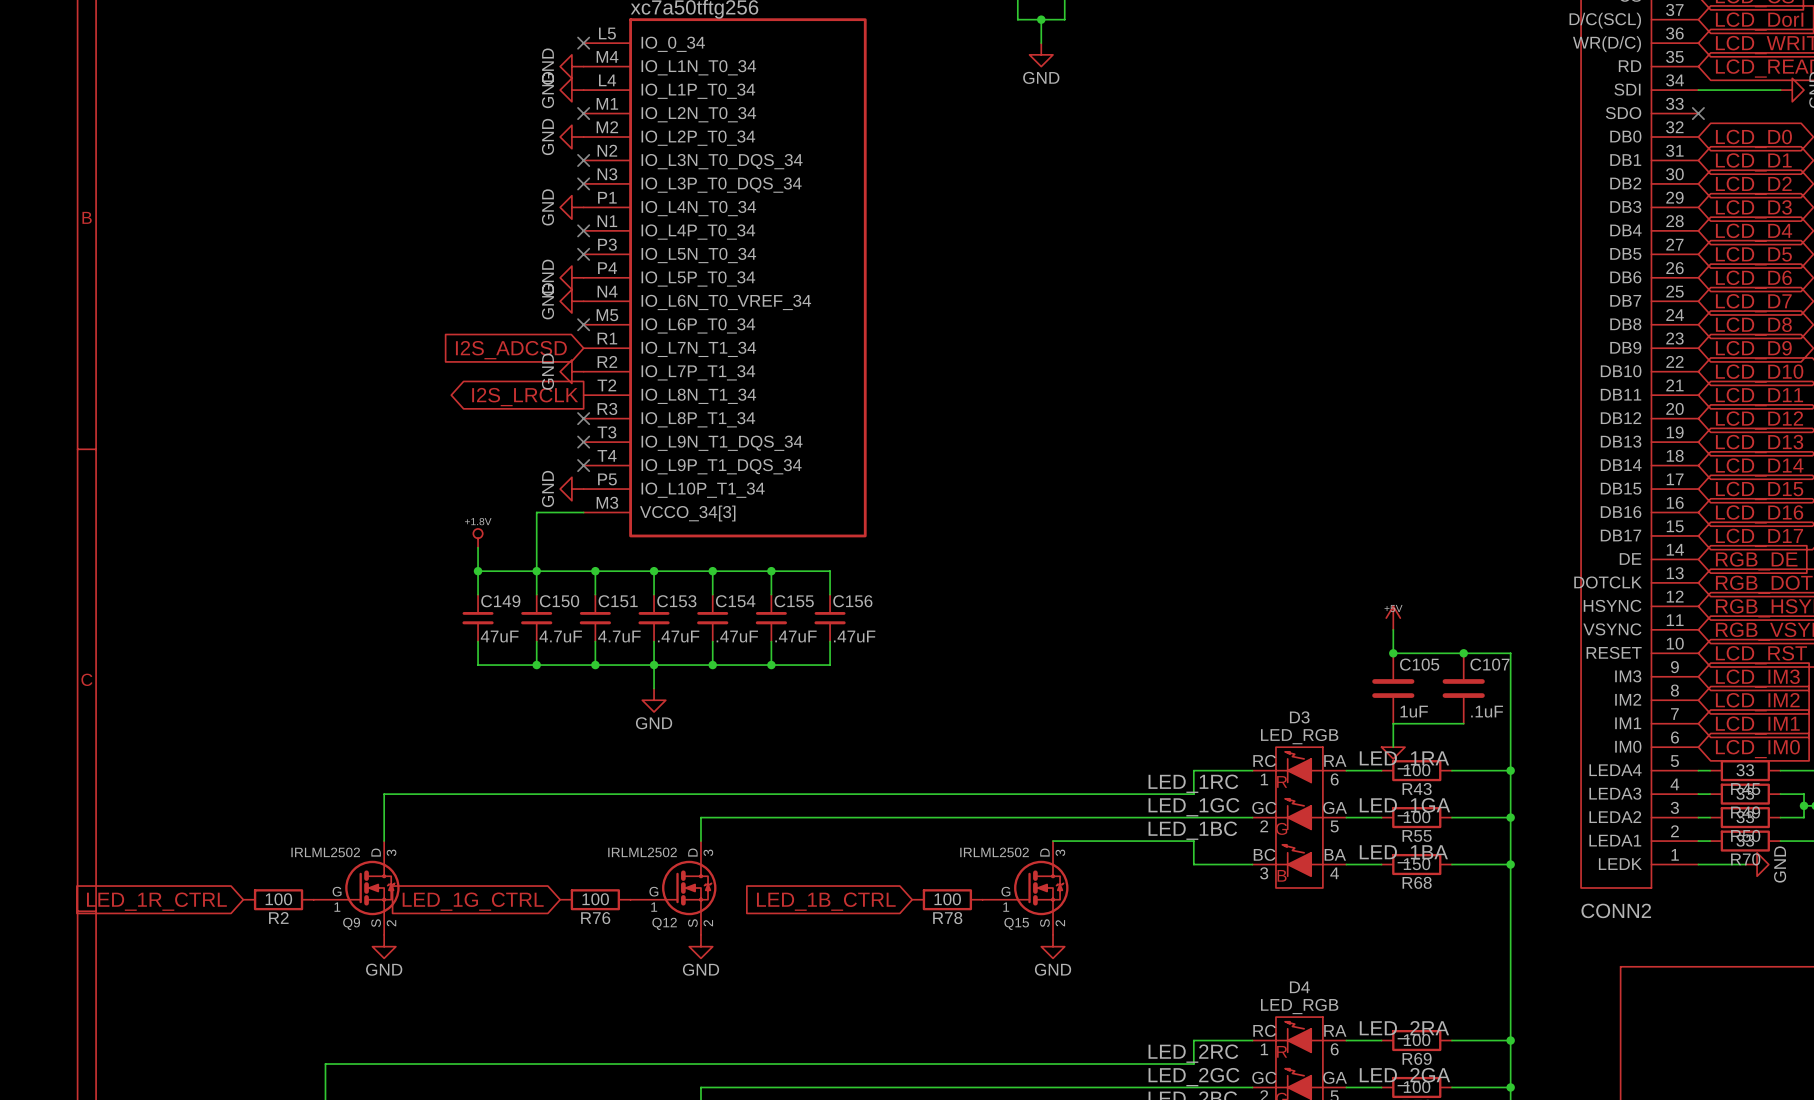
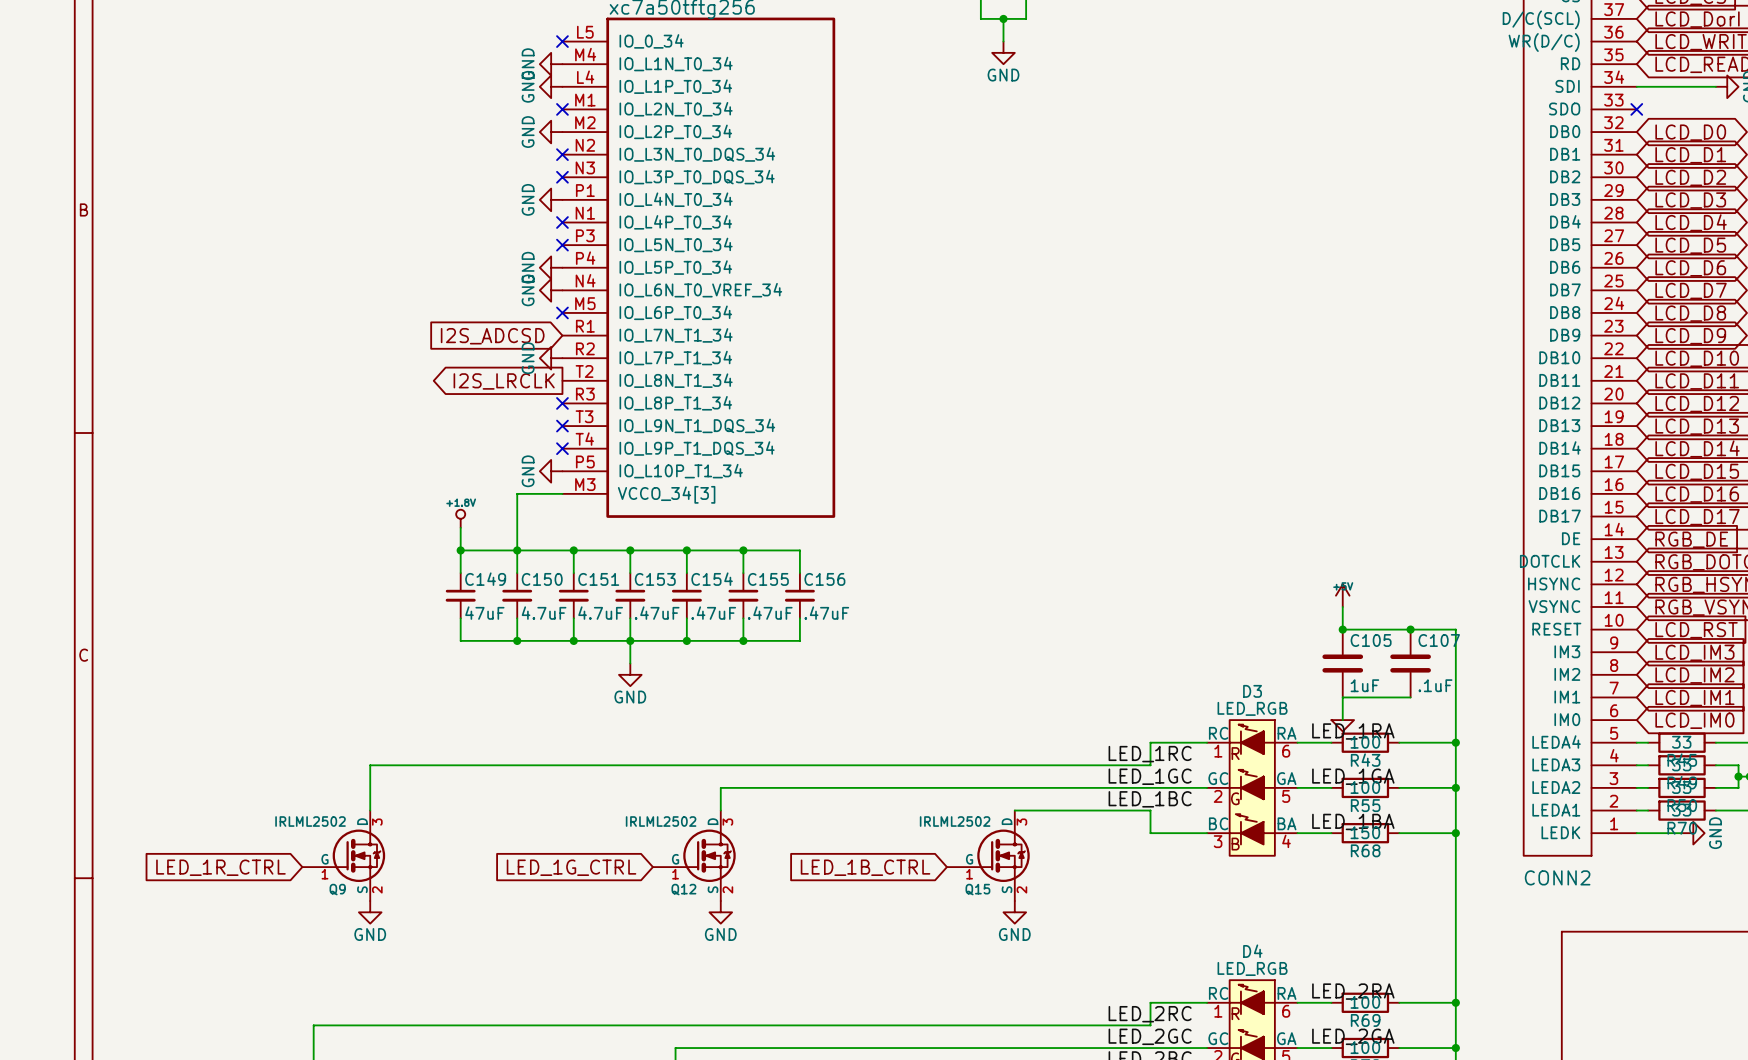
wire: (747, 817) (700, 817) (700, 841) -> (720, 787) (720, 810)
Q12 position: (673, 887) -> (694, 855)
R2: 100 (278, 899) -> none
R76: 100 (595, 899) -> none
R78: 100 (947, 899) -> none
global label position: LED_1R_CTRL (156, 901) -> LED_1R_CTRL (220, 867)
global label position: LED_1G_CTRL (473, 901) -> LED_1G_CTRL (571, 867)
global label position: LED_1B_CTRL (826, 901) -> LED_1B_CTRL (865, 867)
power symbol position: GND (700, 946) -> GND (720, 912)

